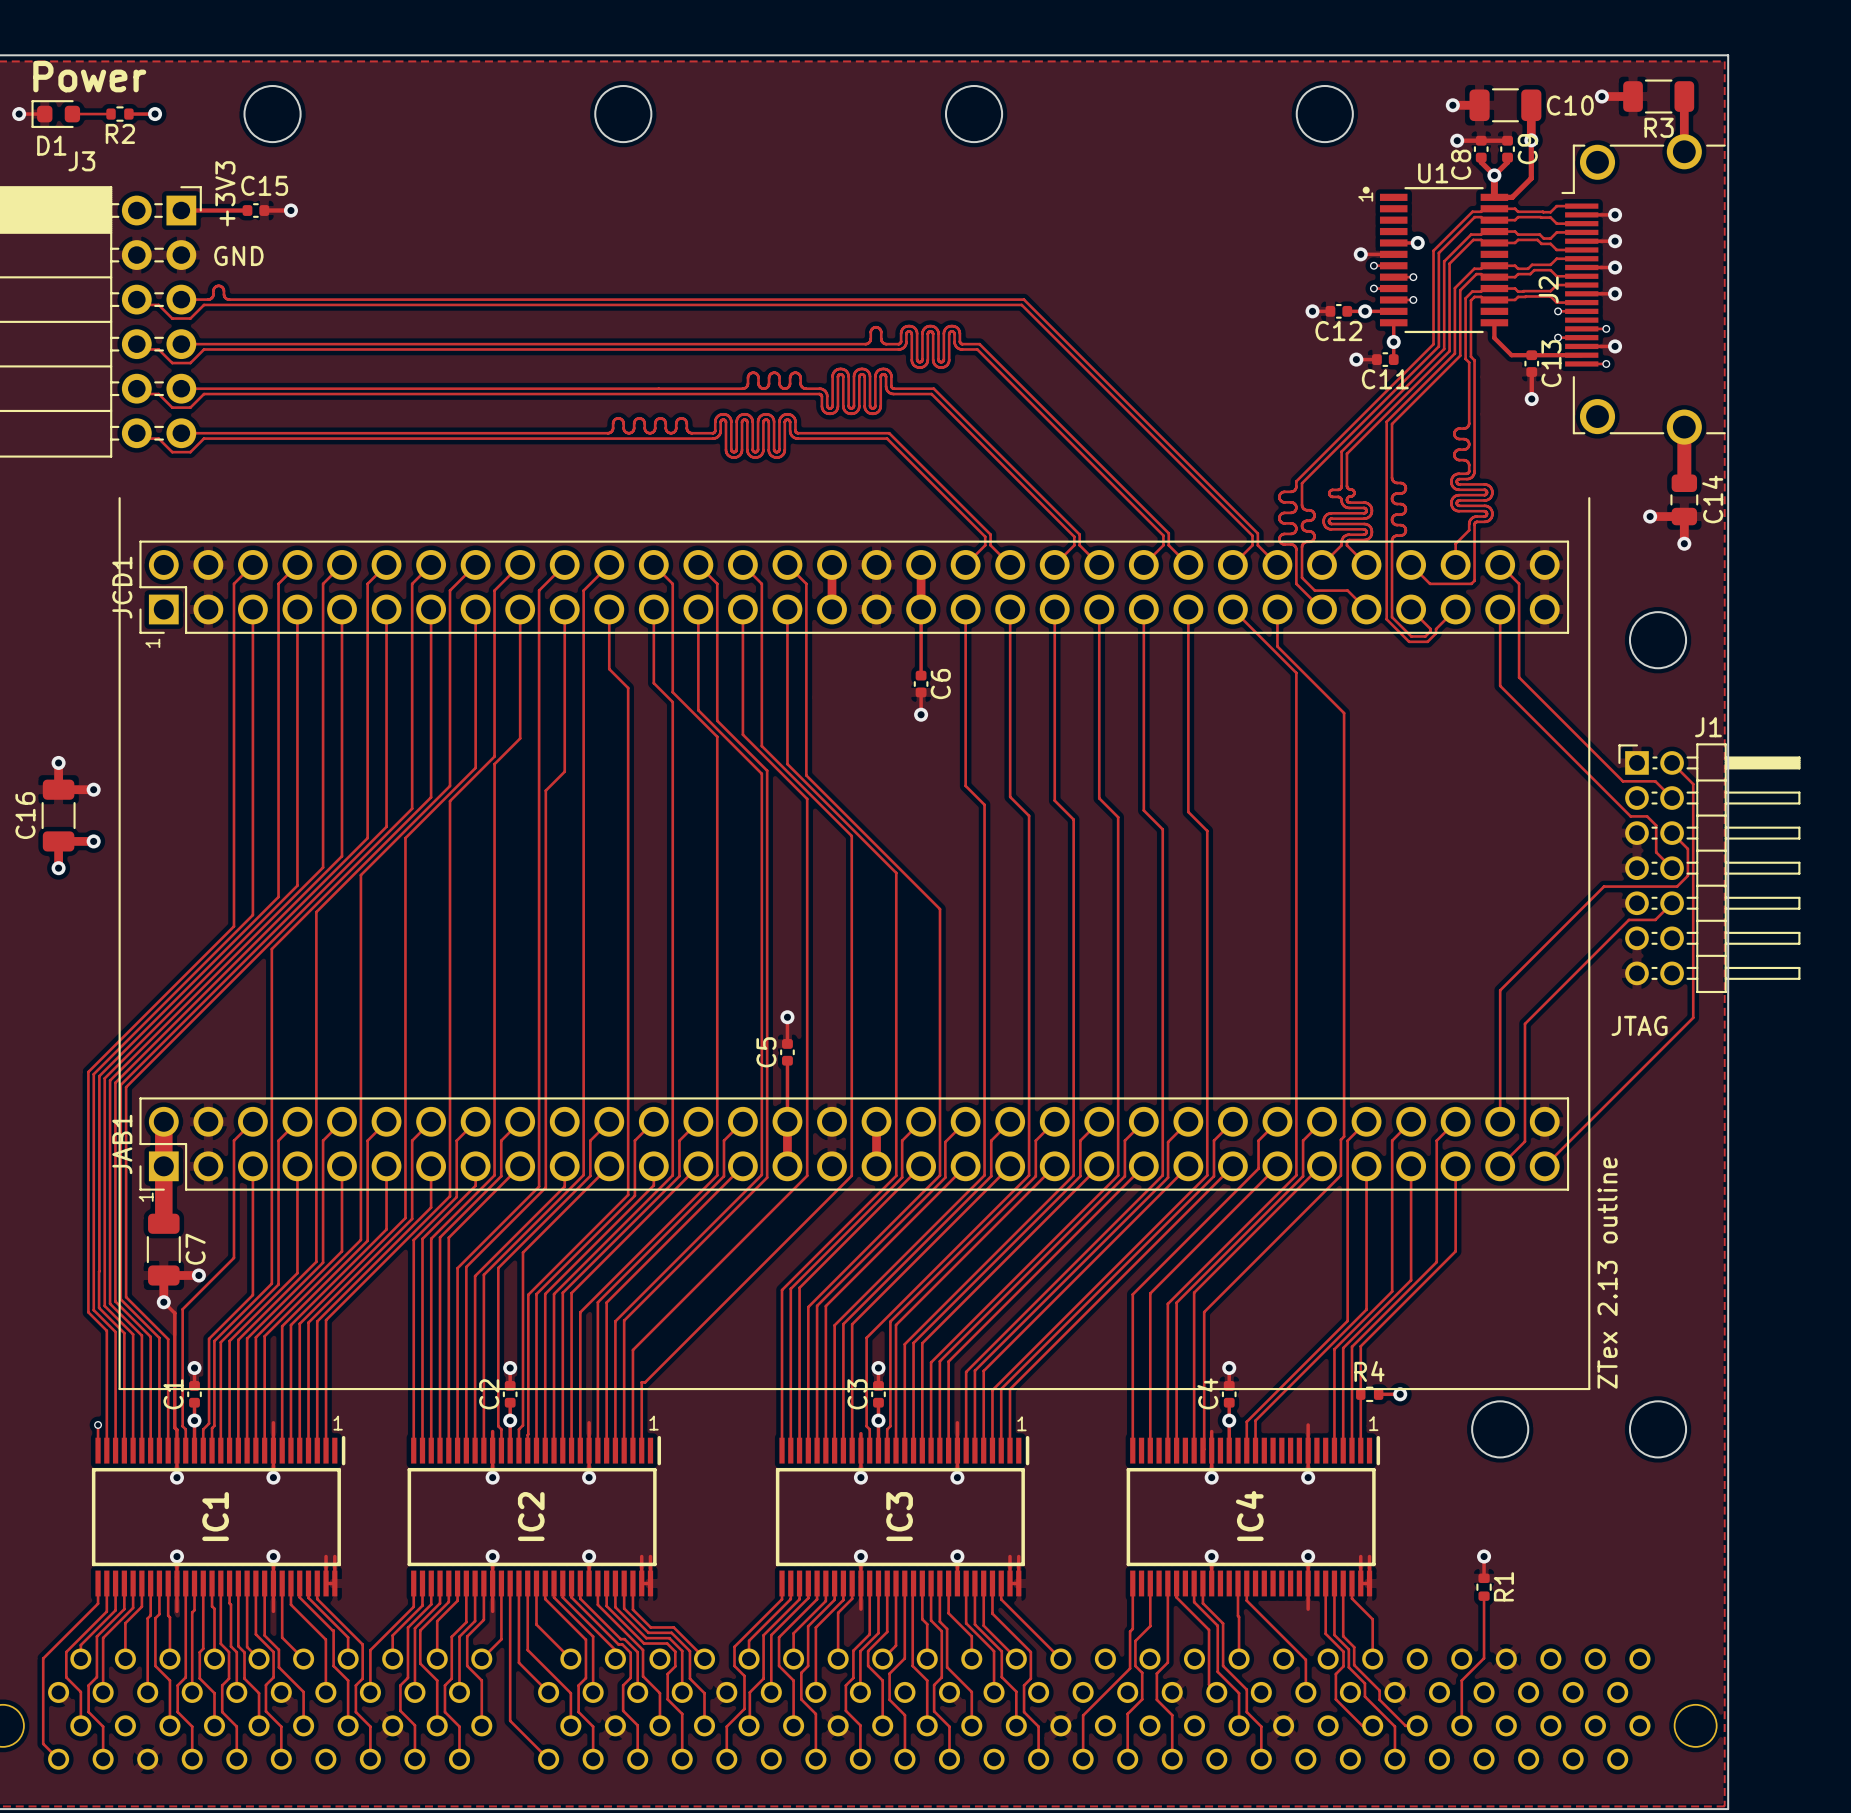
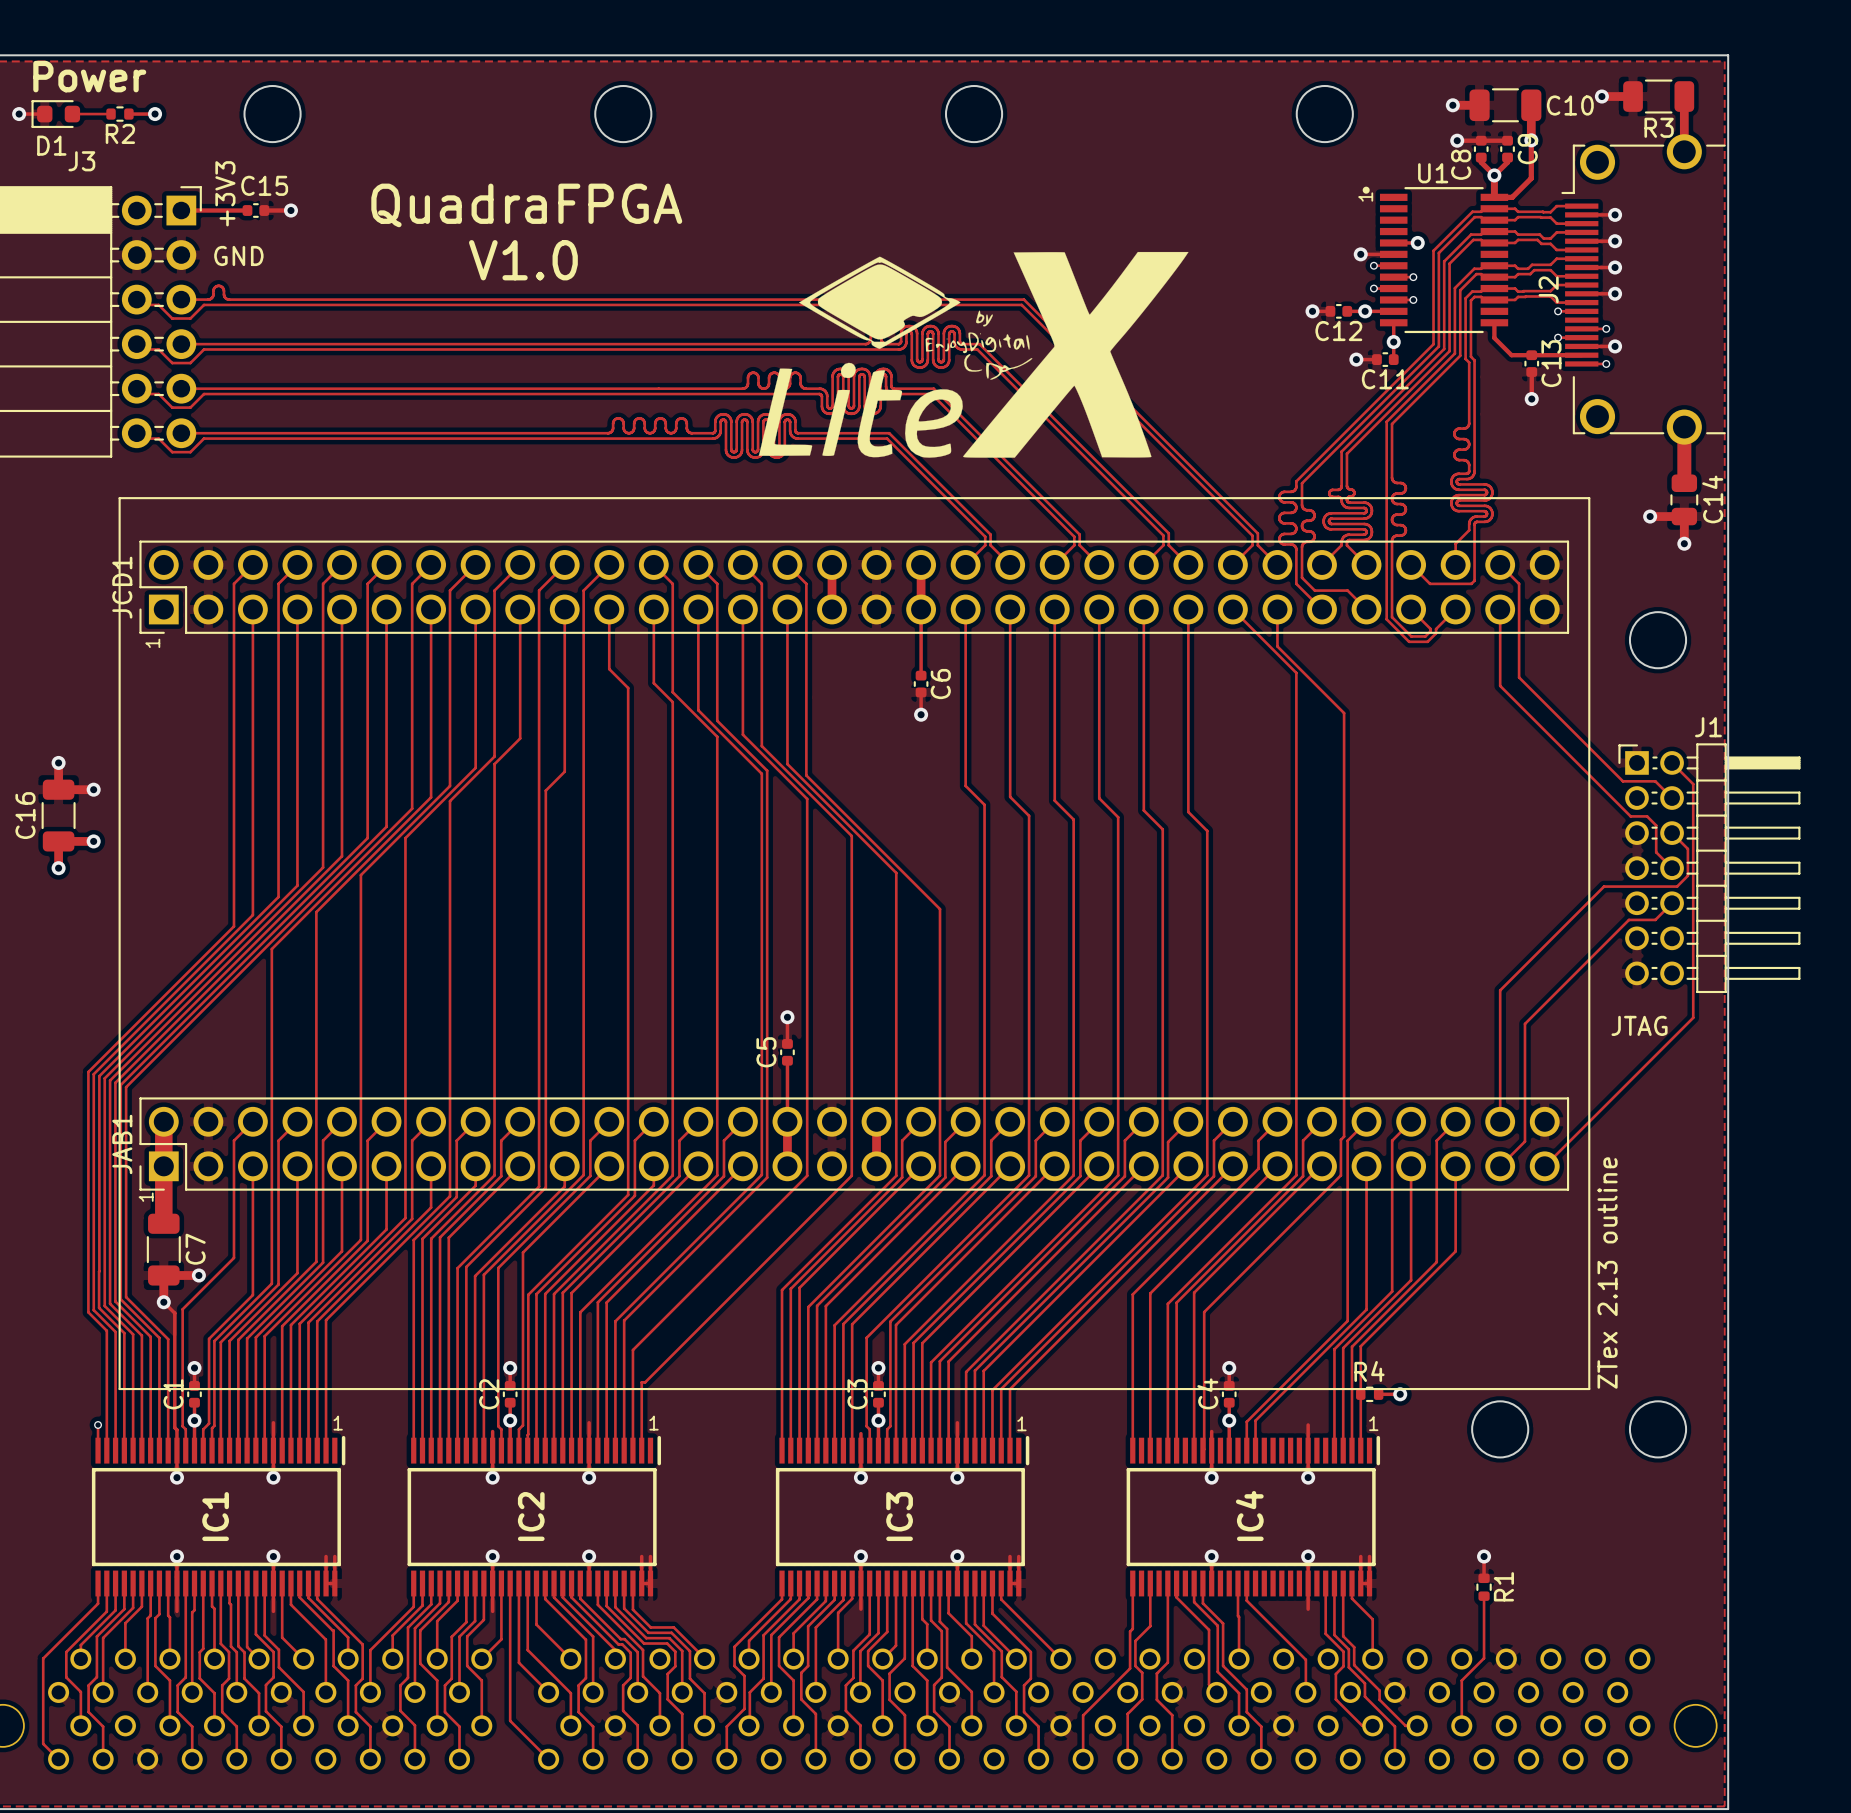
text: none -> QuadraFPGA (526, 205)
drawing: none -> [758, 251, 1189, 458]
text: none -> V1.0 (523, 260)
line: none -> (119, 498) (1589, 498)

